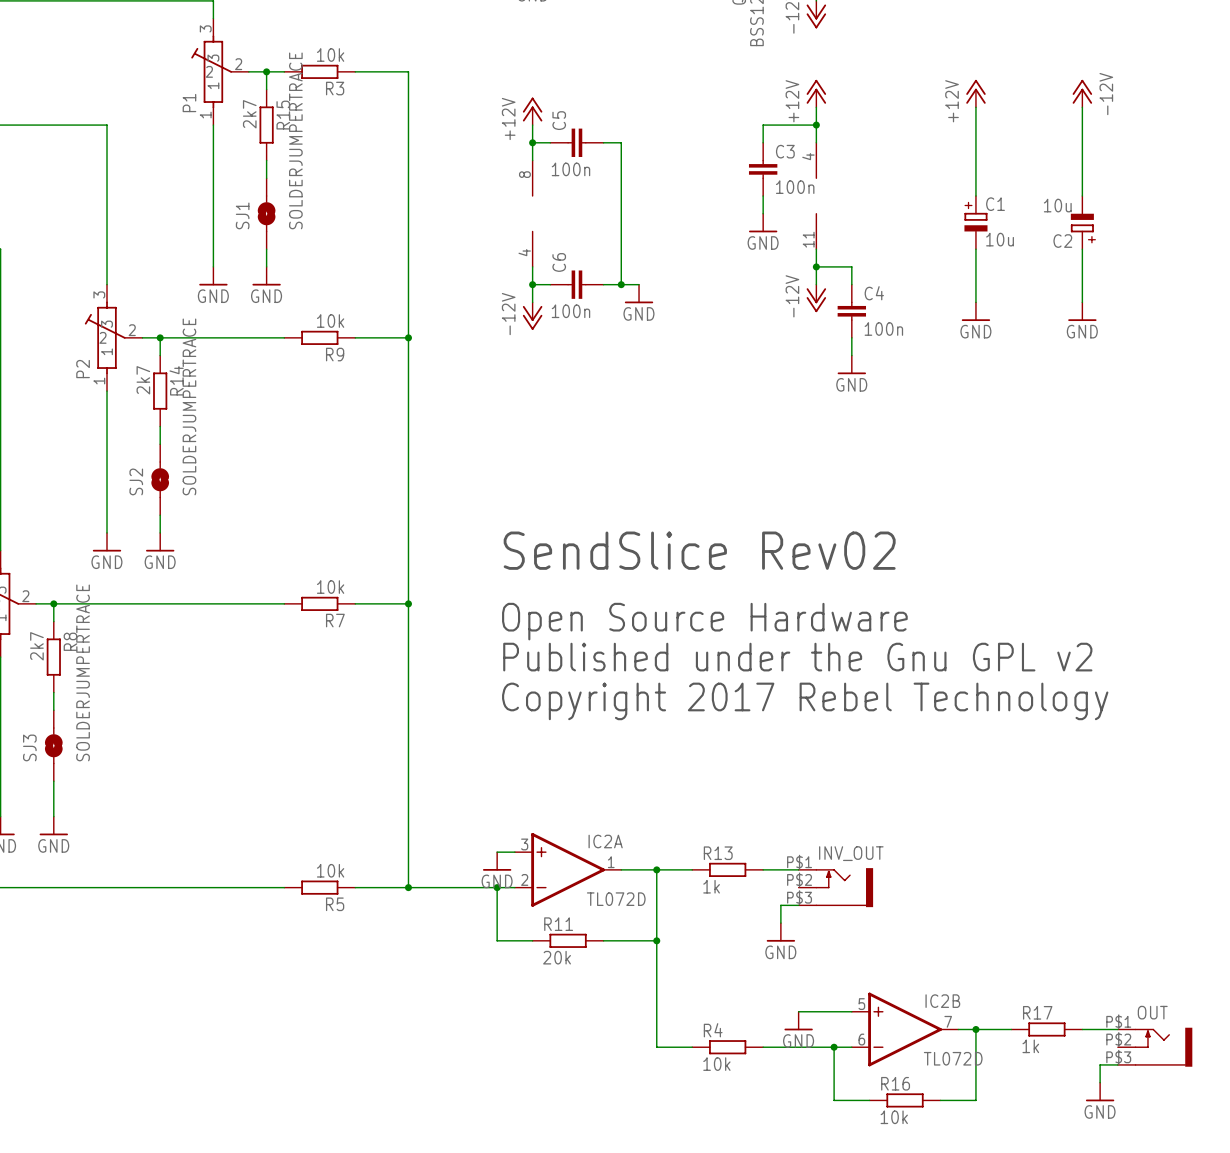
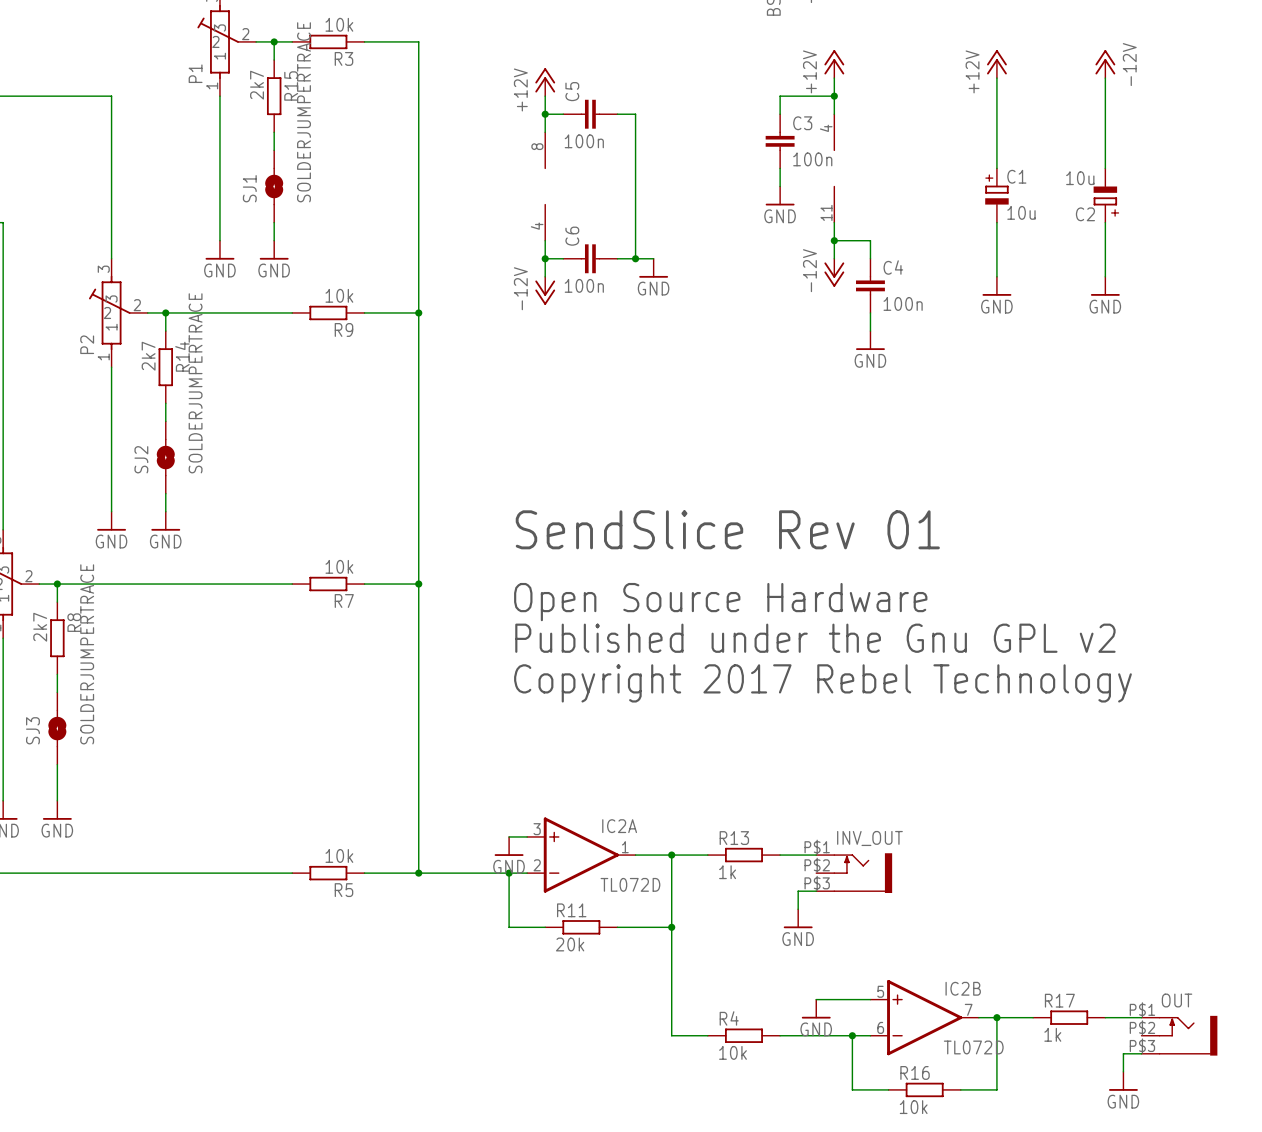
text: SendSlice Rev02 (699, 550) -> SendSlice Rev 01 (727, 529)

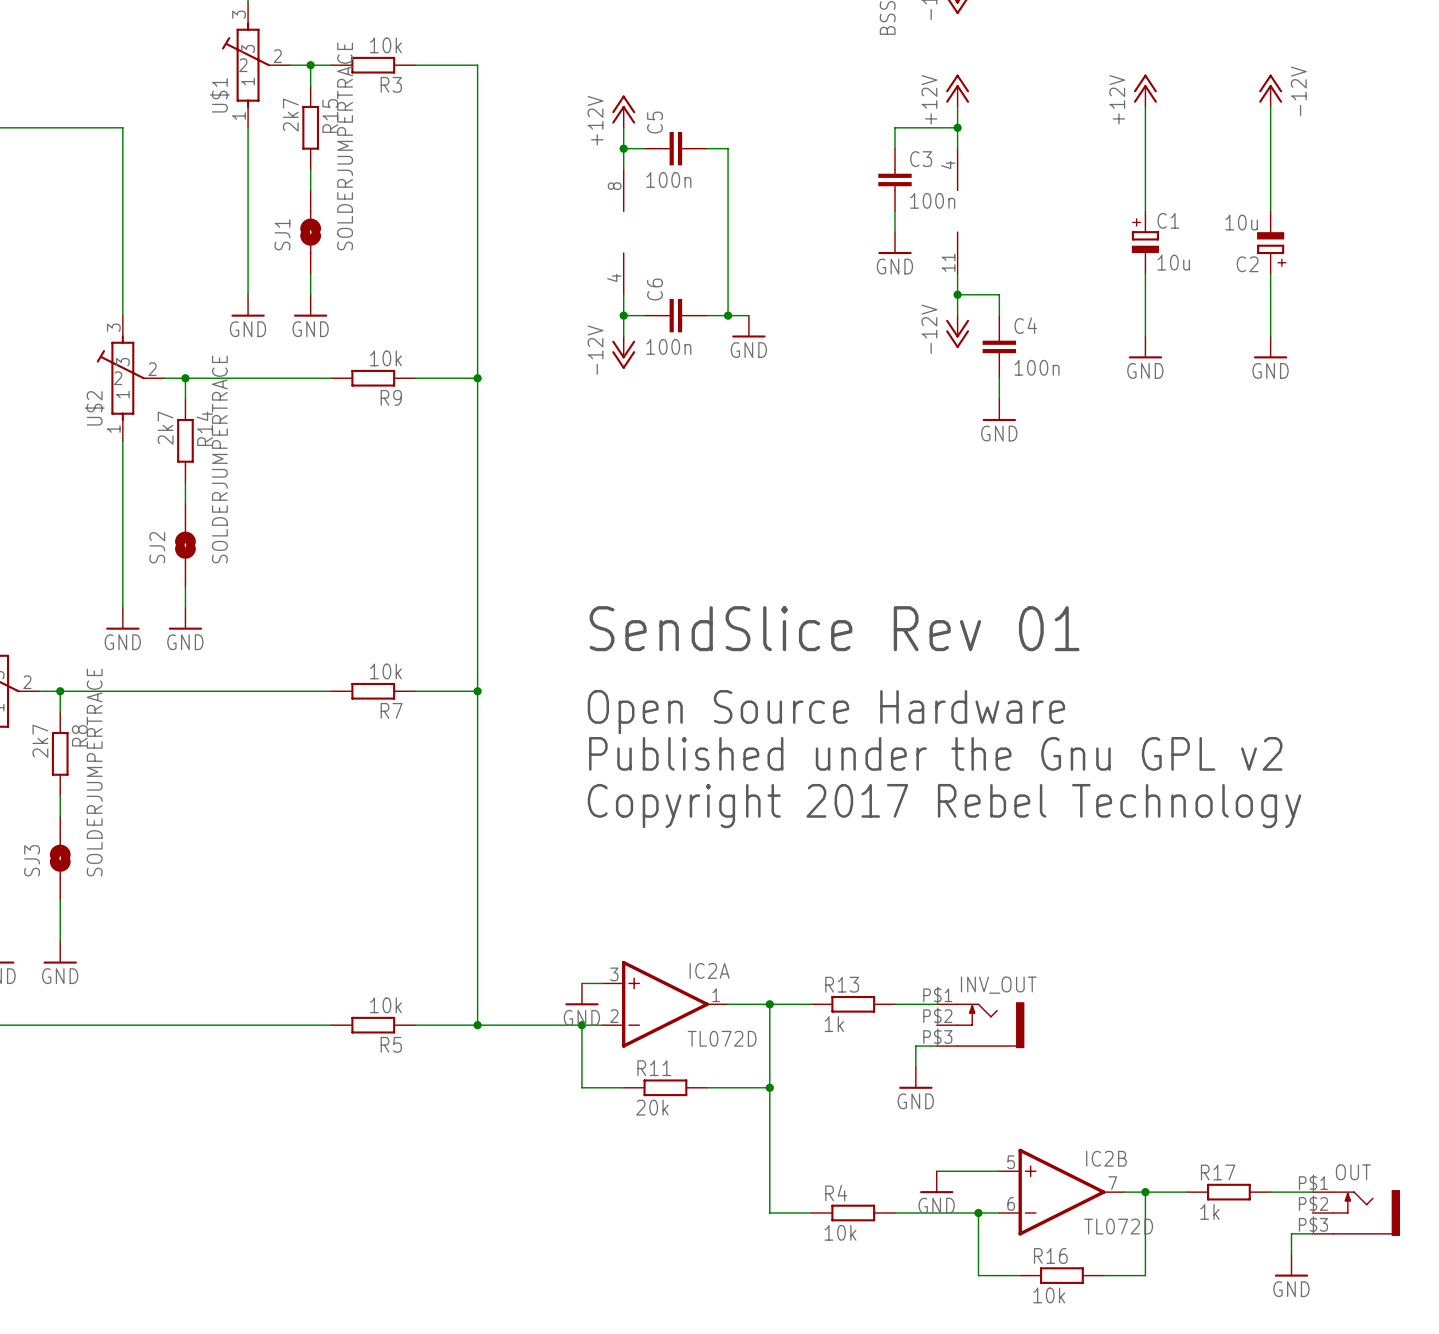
P1 name: P1 (195, 73) -> U$1 (219, 95)
P2 name: P2 (87, 344) -> U$2 (94, 408)

